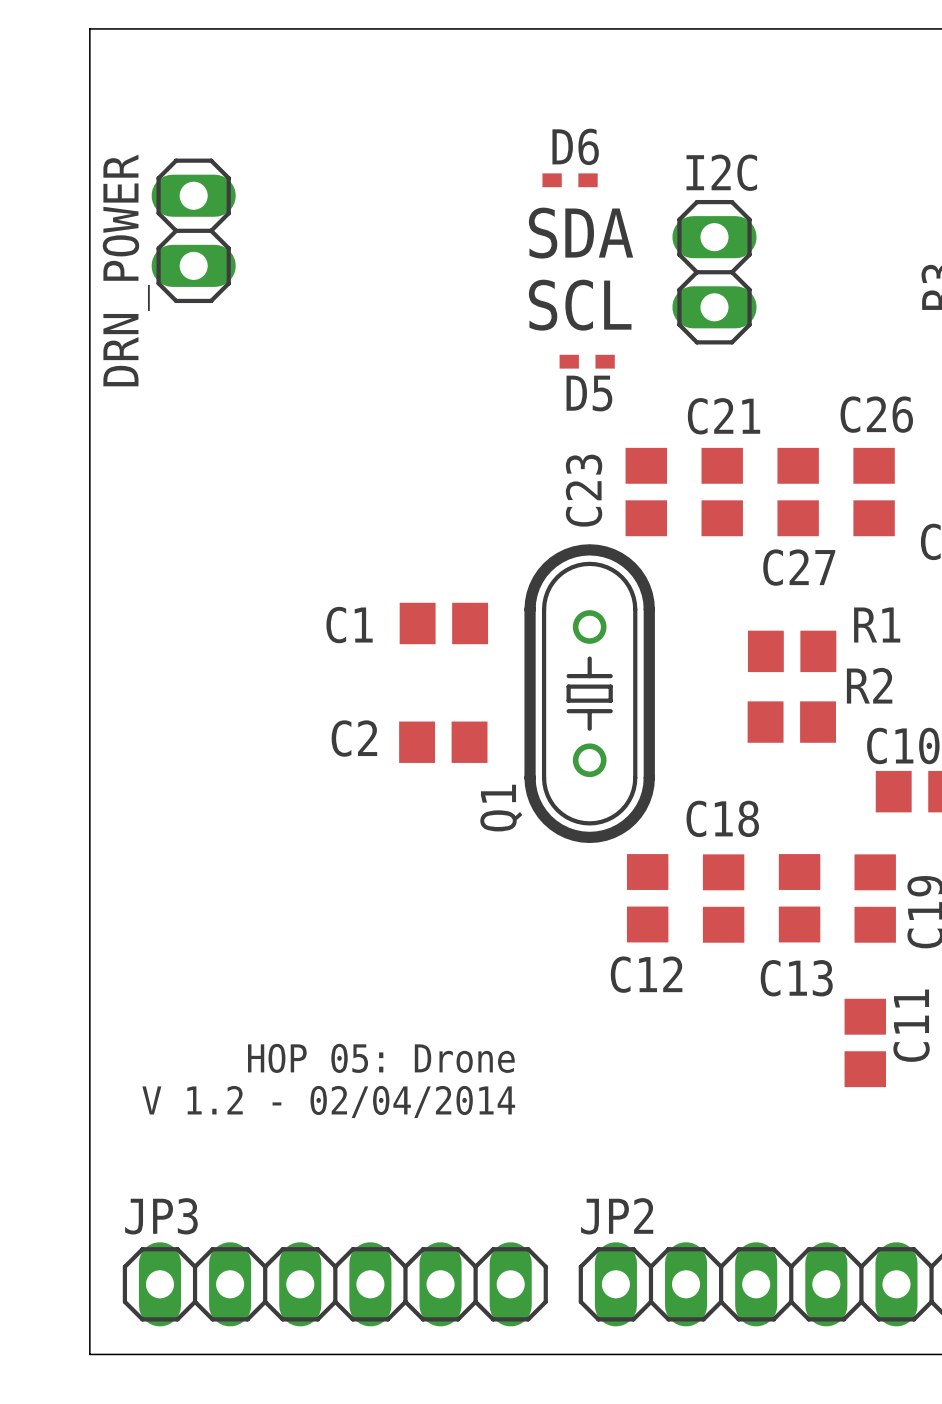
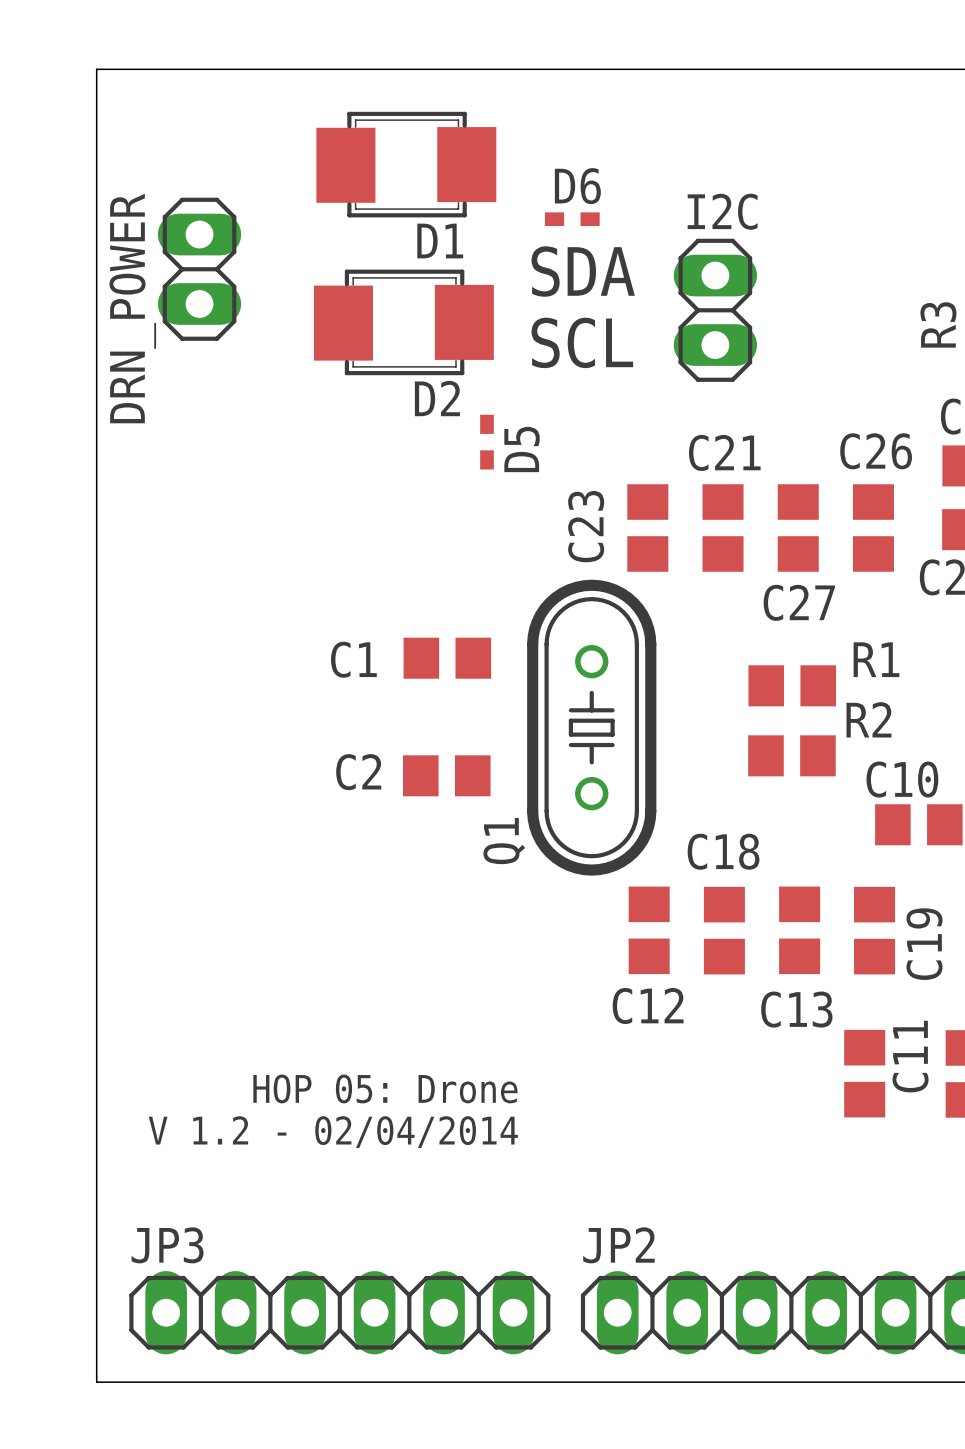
D1: none -> (406, 164)
D2: none -> (403, 322)
D5 rotation: 0° (587, 361) -> 90° clockwise (486, 442)
D5 position: (587, 361) -> (486, 442)

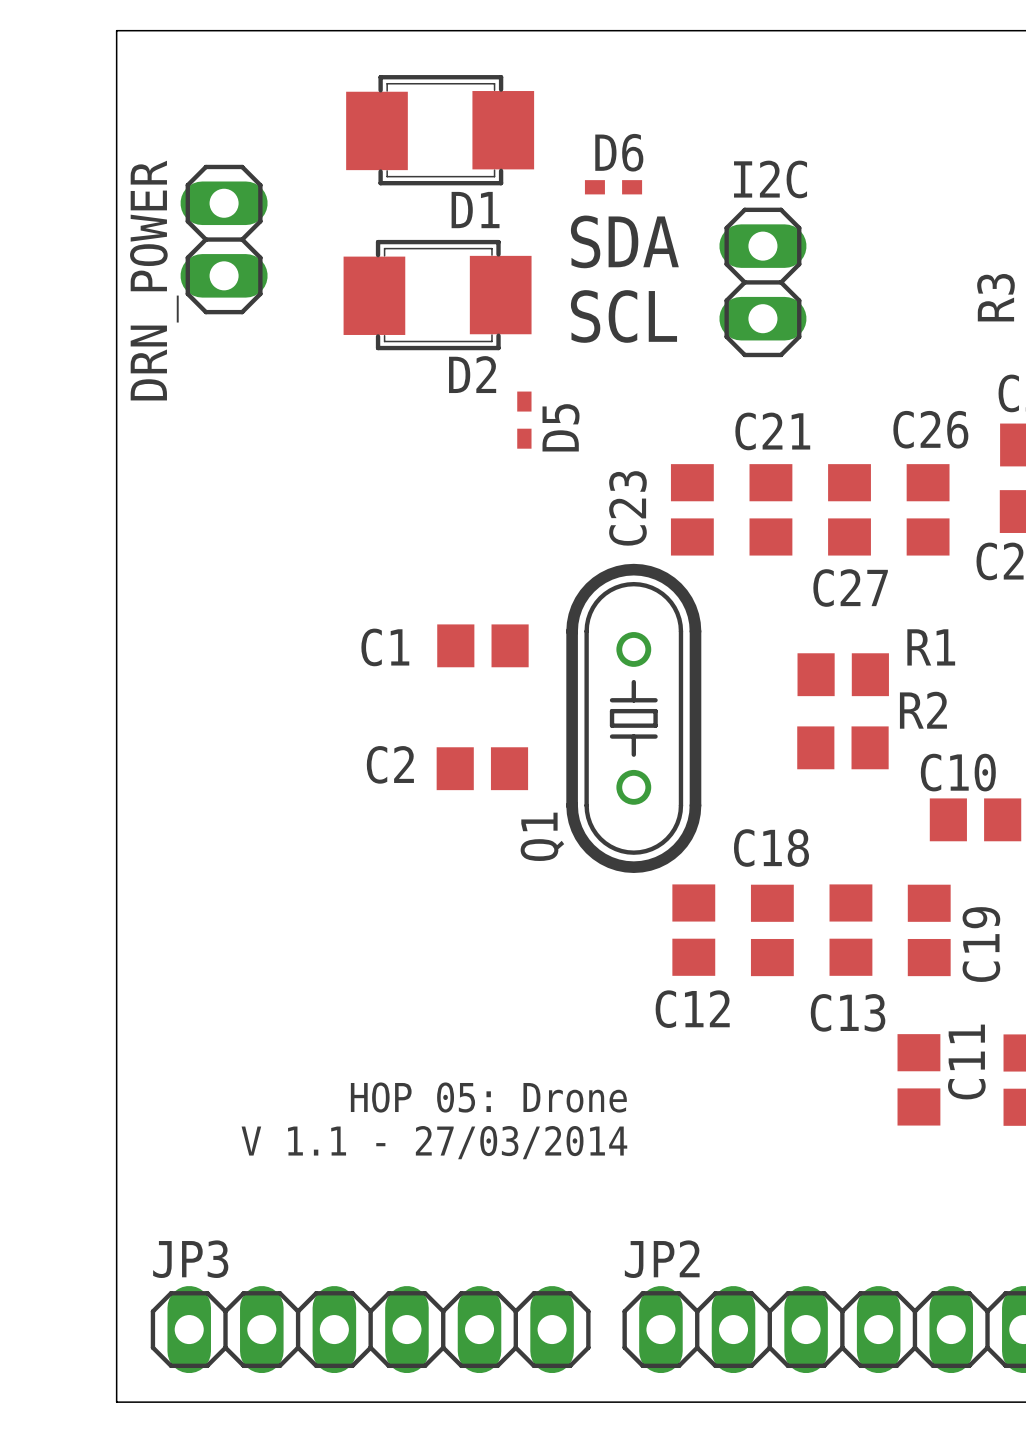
text position: HOP 05: Drone (385, 1088) -> HOP 05: Drone (488, 1097)
text: V 1.2 - 02/04/2014 (333, 1132) -> V 1.1 - 27/03/2014 (434, 1142)

